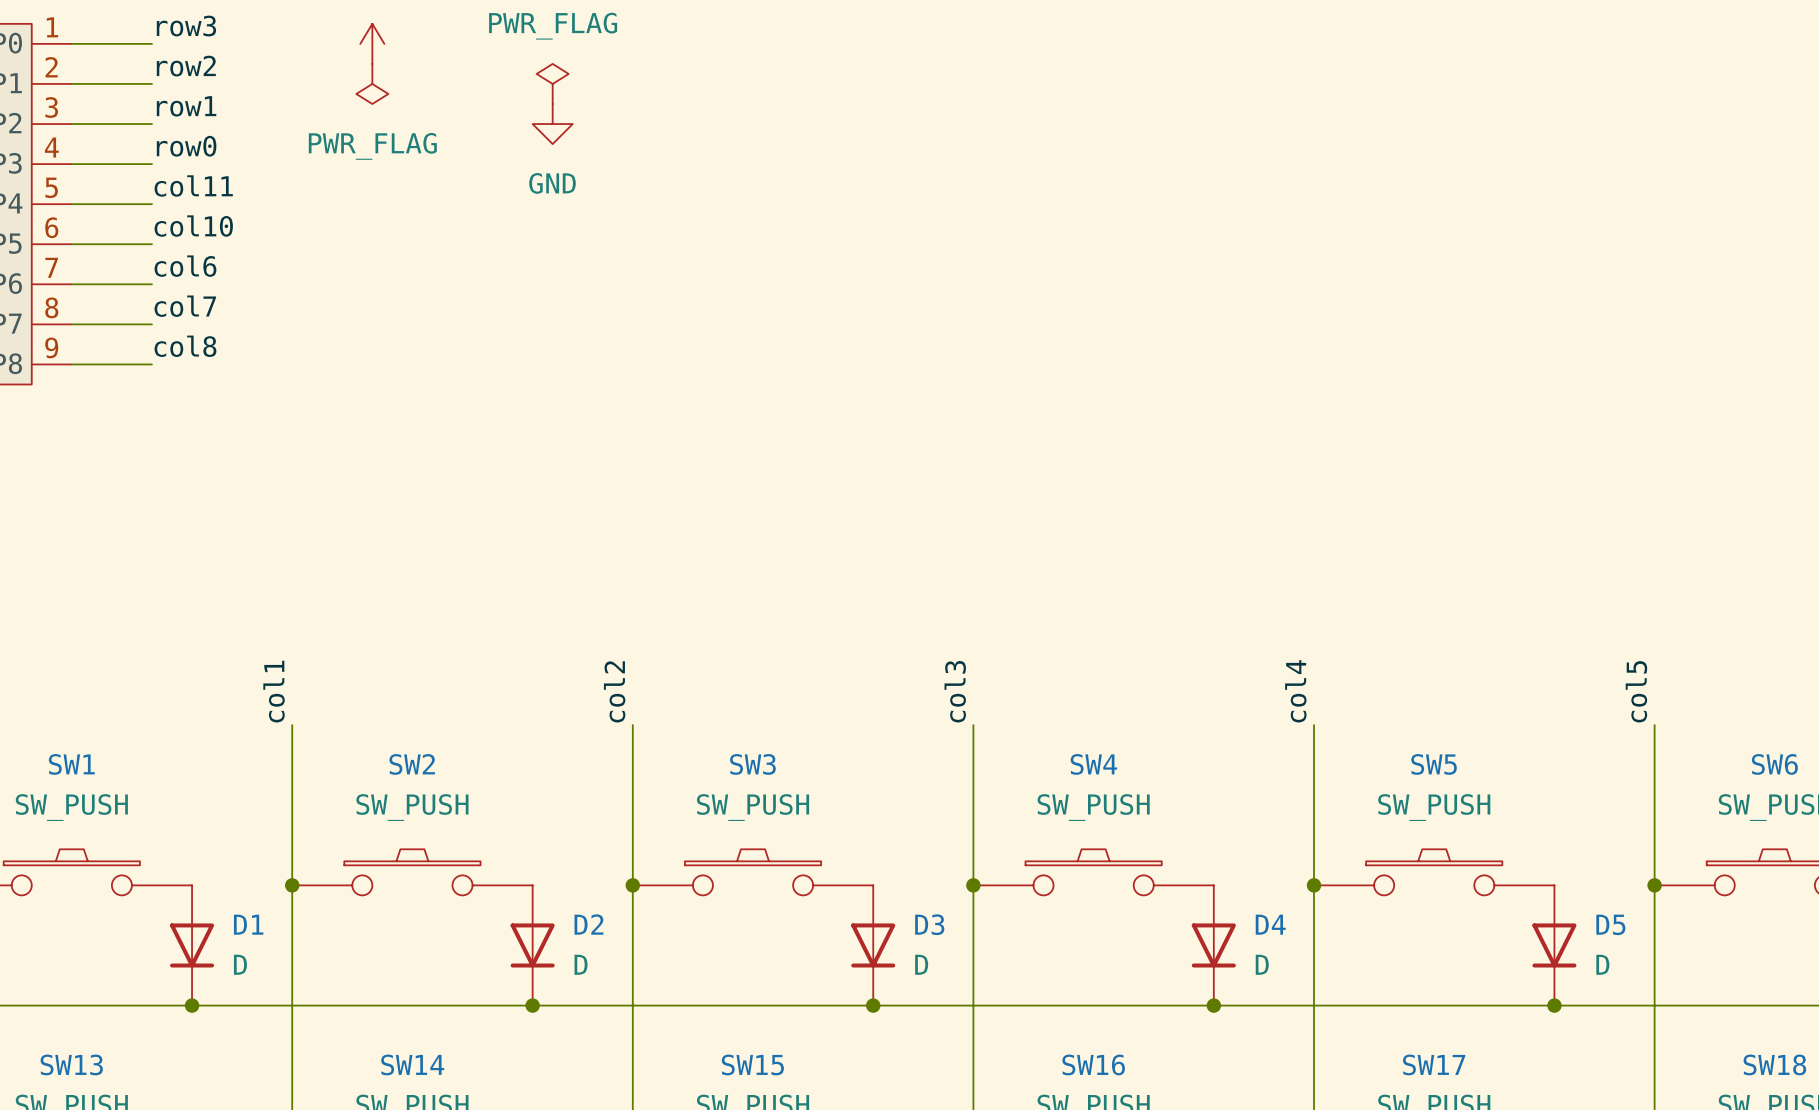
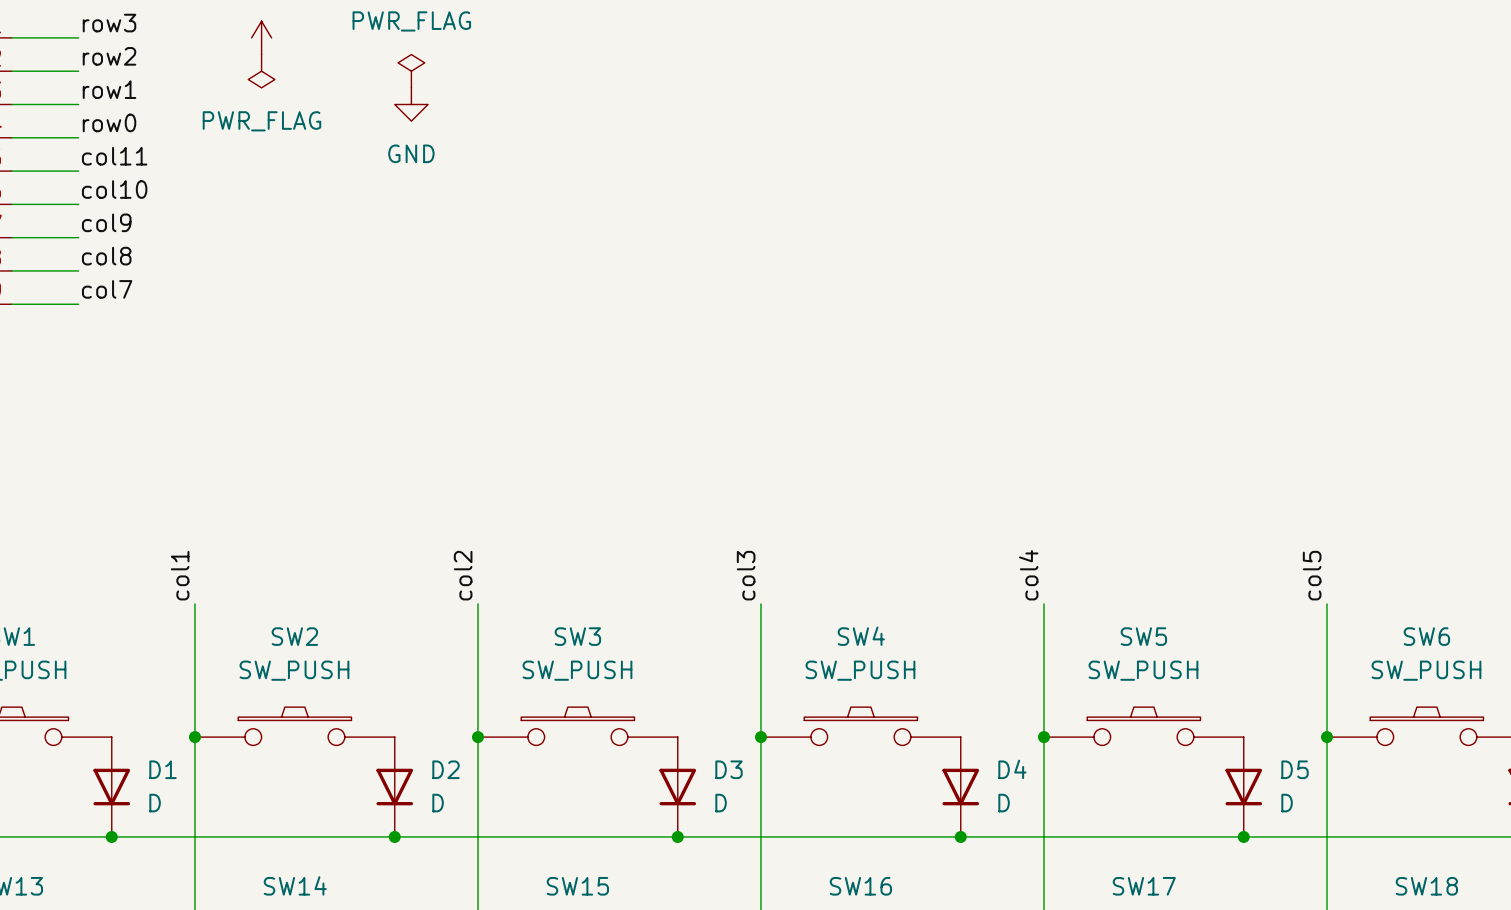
label: col6 (185, 266) -> col9 (106, 222)
label: col7 (185, 306) -> col8 (106, 256)
label: col8 (185, 346) -> col7 (107, 289)

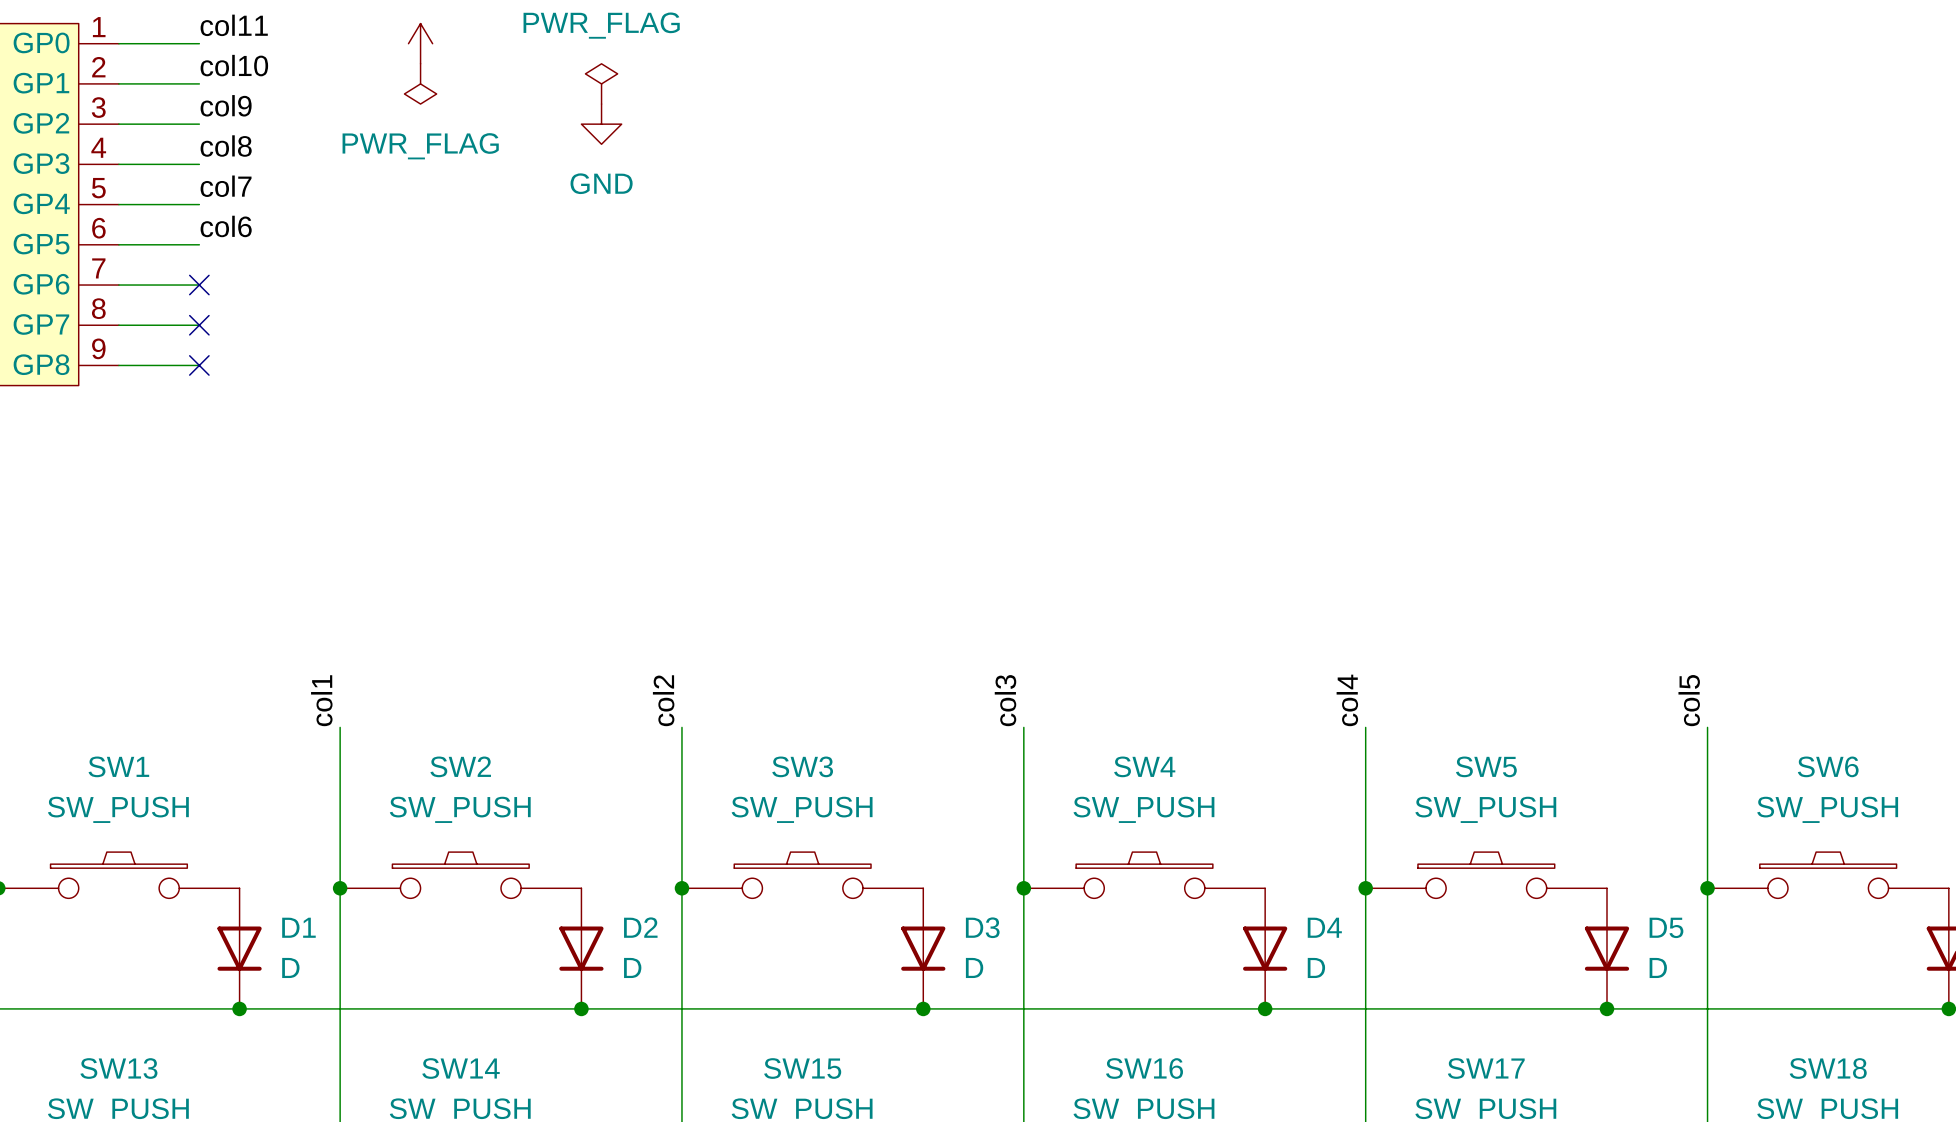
label: row3 (109, 23) -> col11 (234, 25)
label: row2 (109, 56) -> col10 (234, 65)
label: row1 (109, 89) -> col9 (226, 105)
label: row0 (109, 122) -> col8 (226, 146)
label: col11 (114, 156) -> col7 (226, 186)
label: col10 (114, 189) -> col6 (226, 226)
label: col9 (106, 222) -> none
no-connect mark: none -> (199, 285)
label: col8 (106, 256) -> none
no-connect mark: none -> (199, 325)
label: col7 (107, 289) -> none
no-connect mark: none -> (199, 365)

